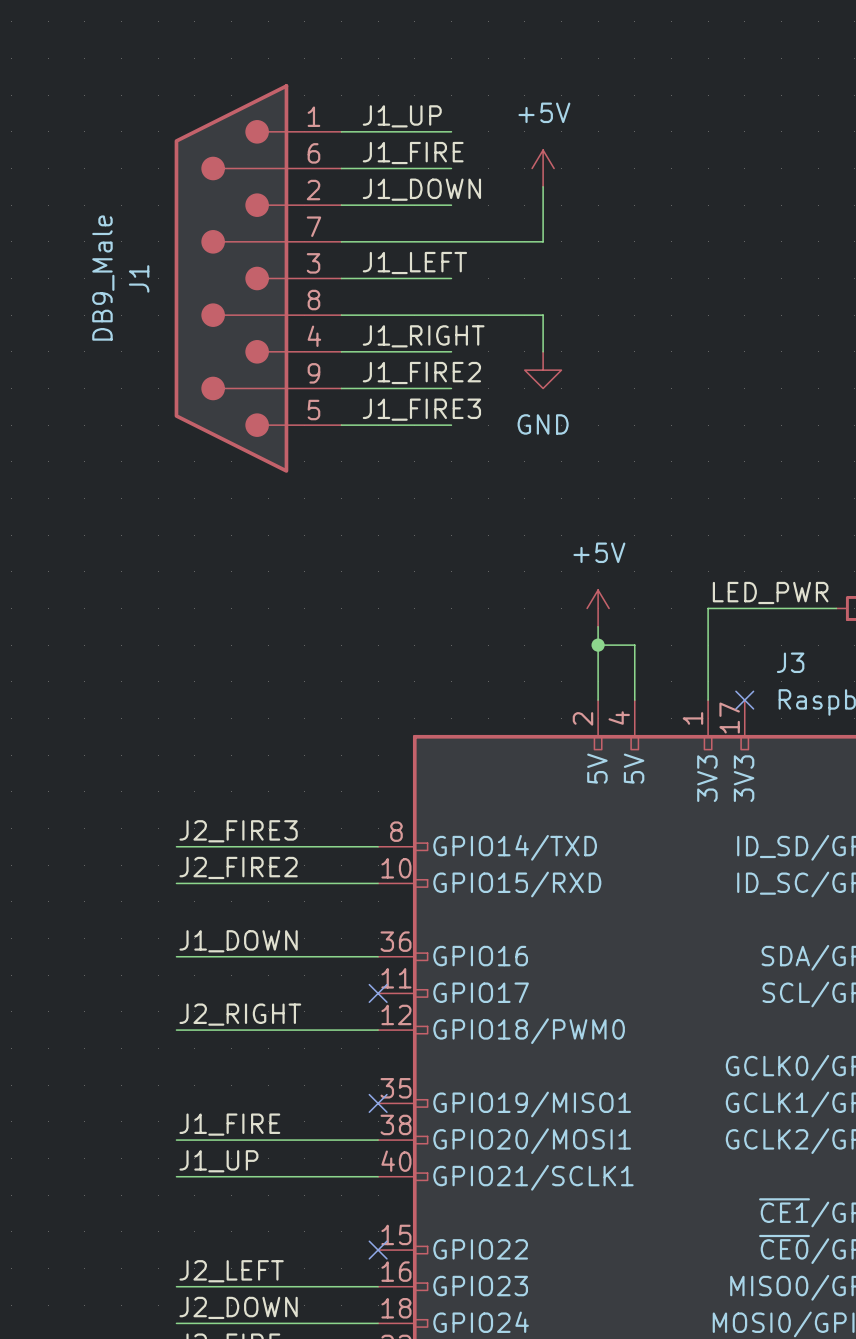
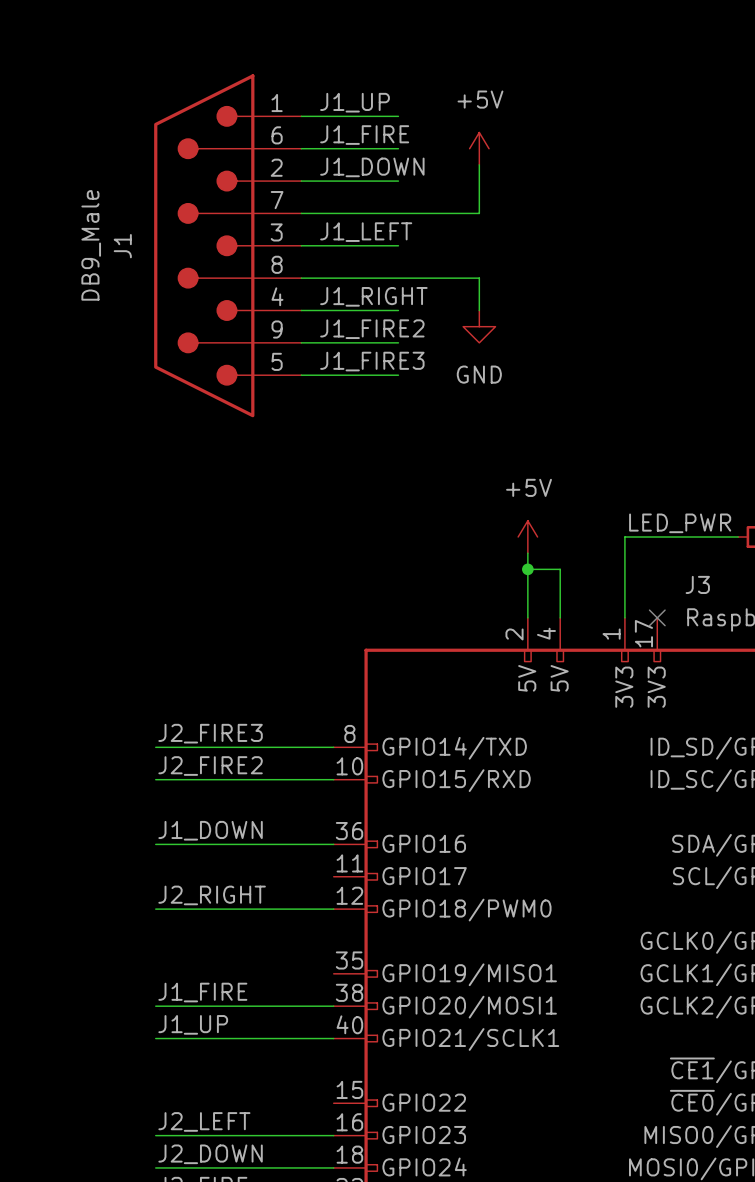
no-connect mark: (378, 993) -> none
no-connect mark: (378, 1103) -> none
no-connect mark: (378, 1250) -> none

